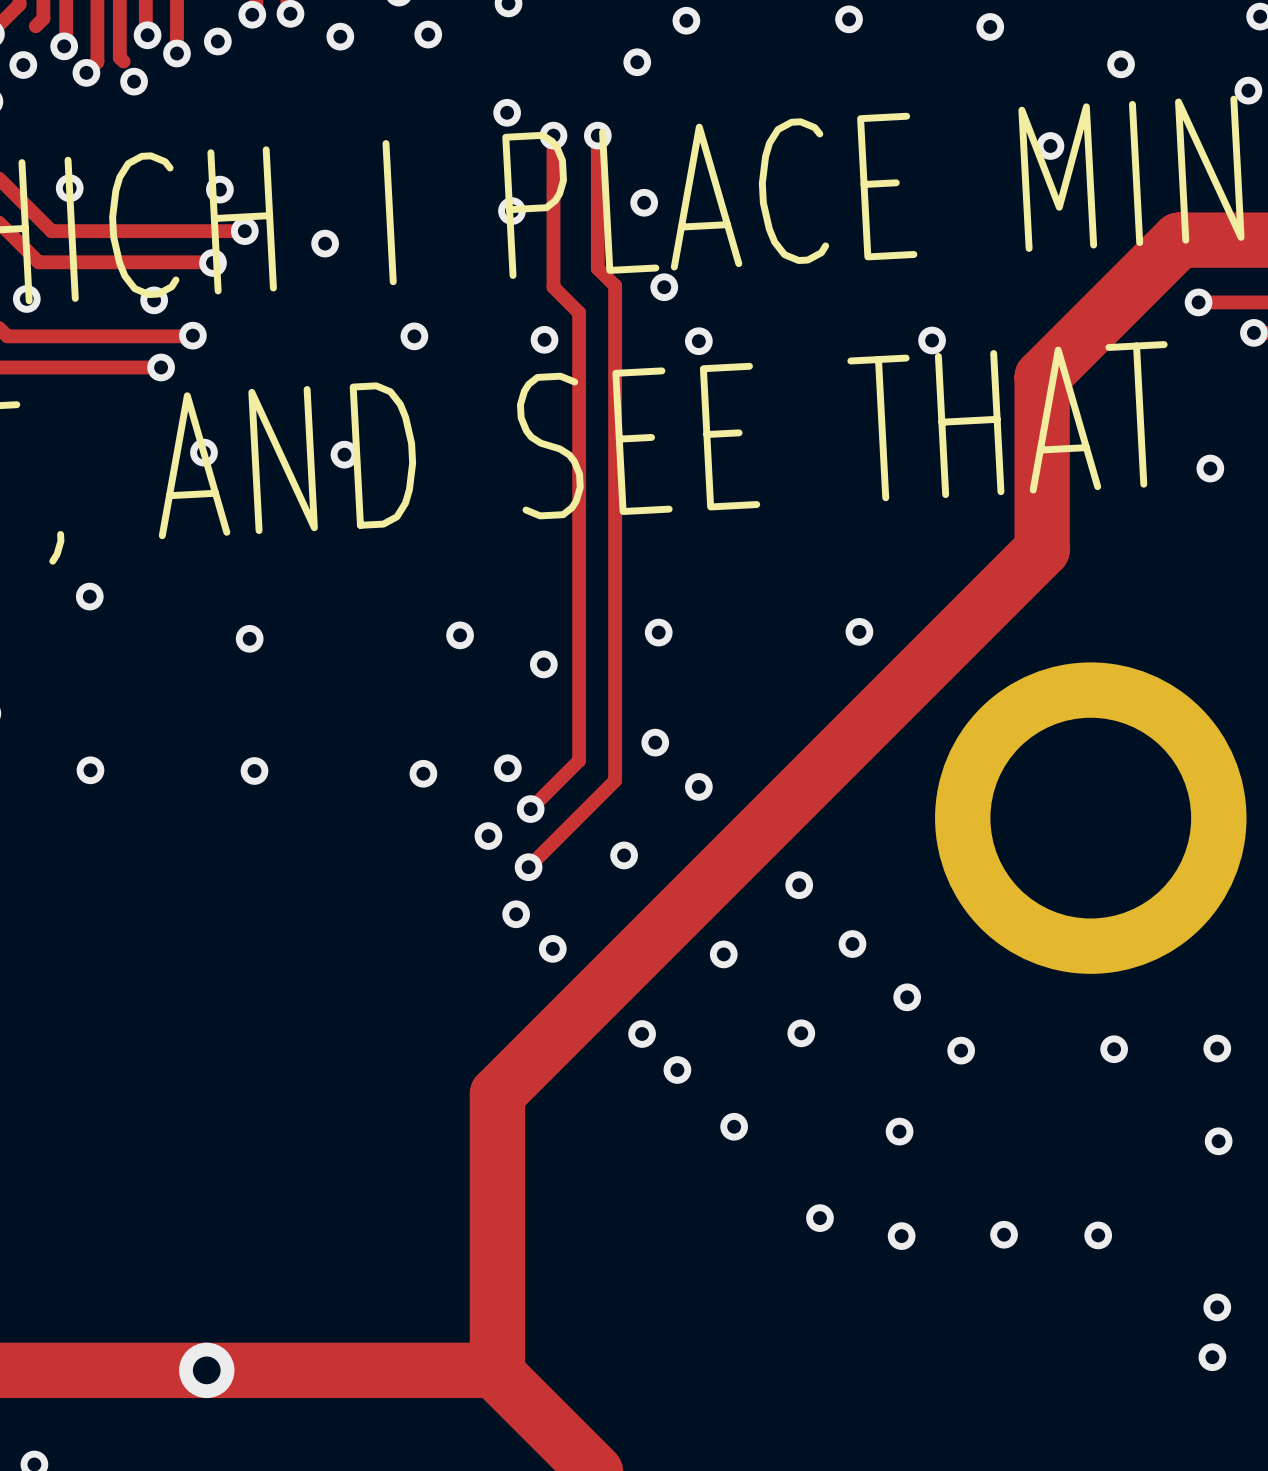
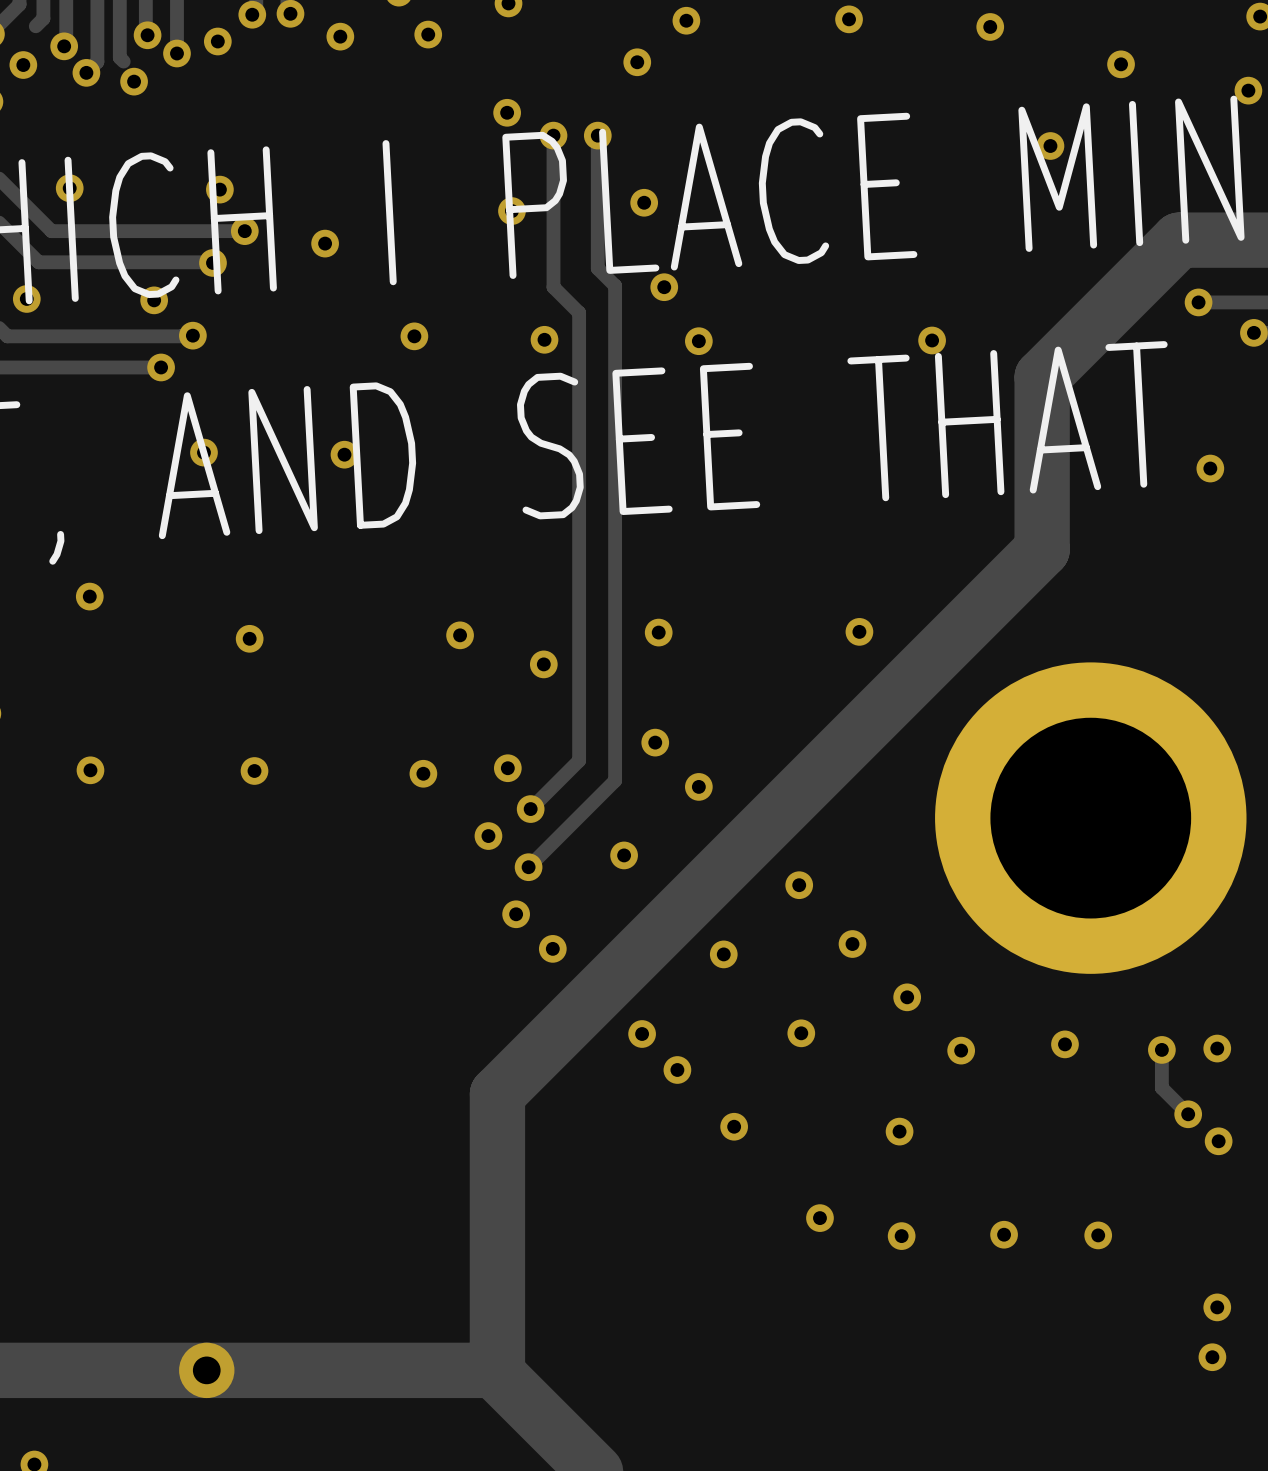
via: none -> (1064, 1044)
via: (1114, 1049) -> none
track: none -> (1161, 1049) (1161, 1087) (1188, 1114)
via: none -> (1161, 1049)
via: none -> (1188, 1114)

